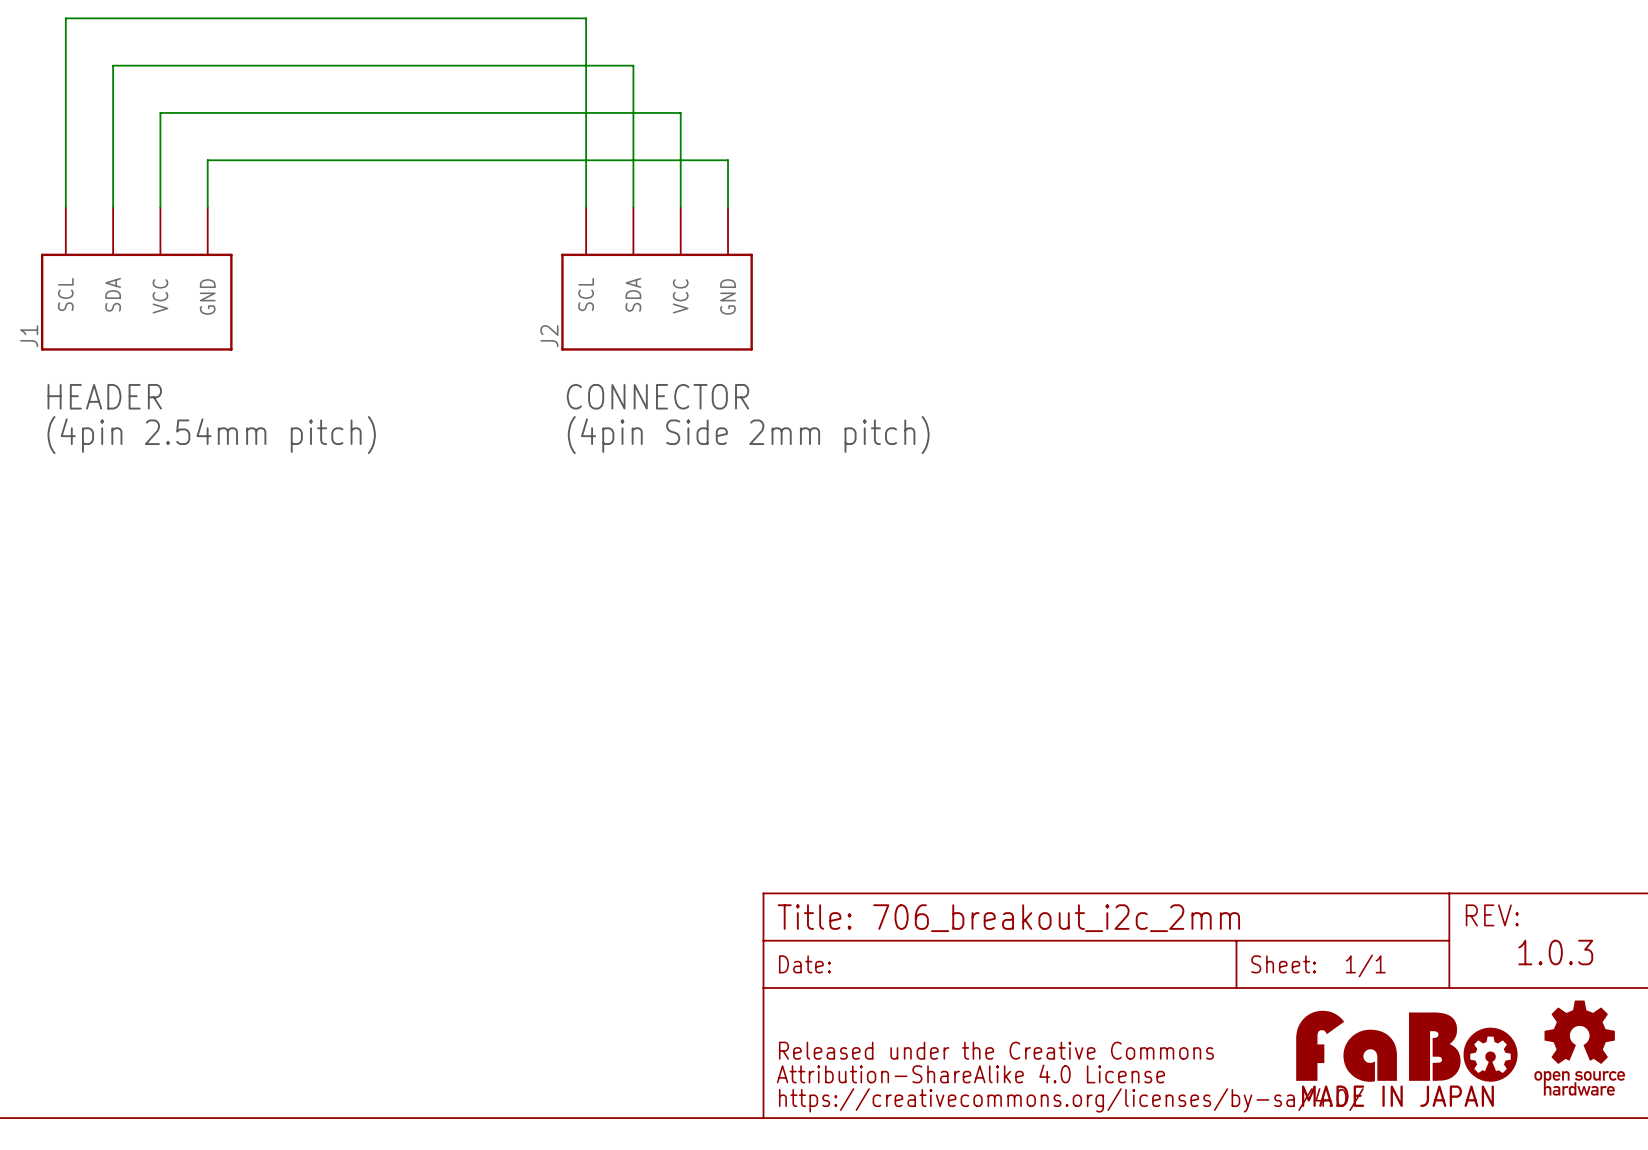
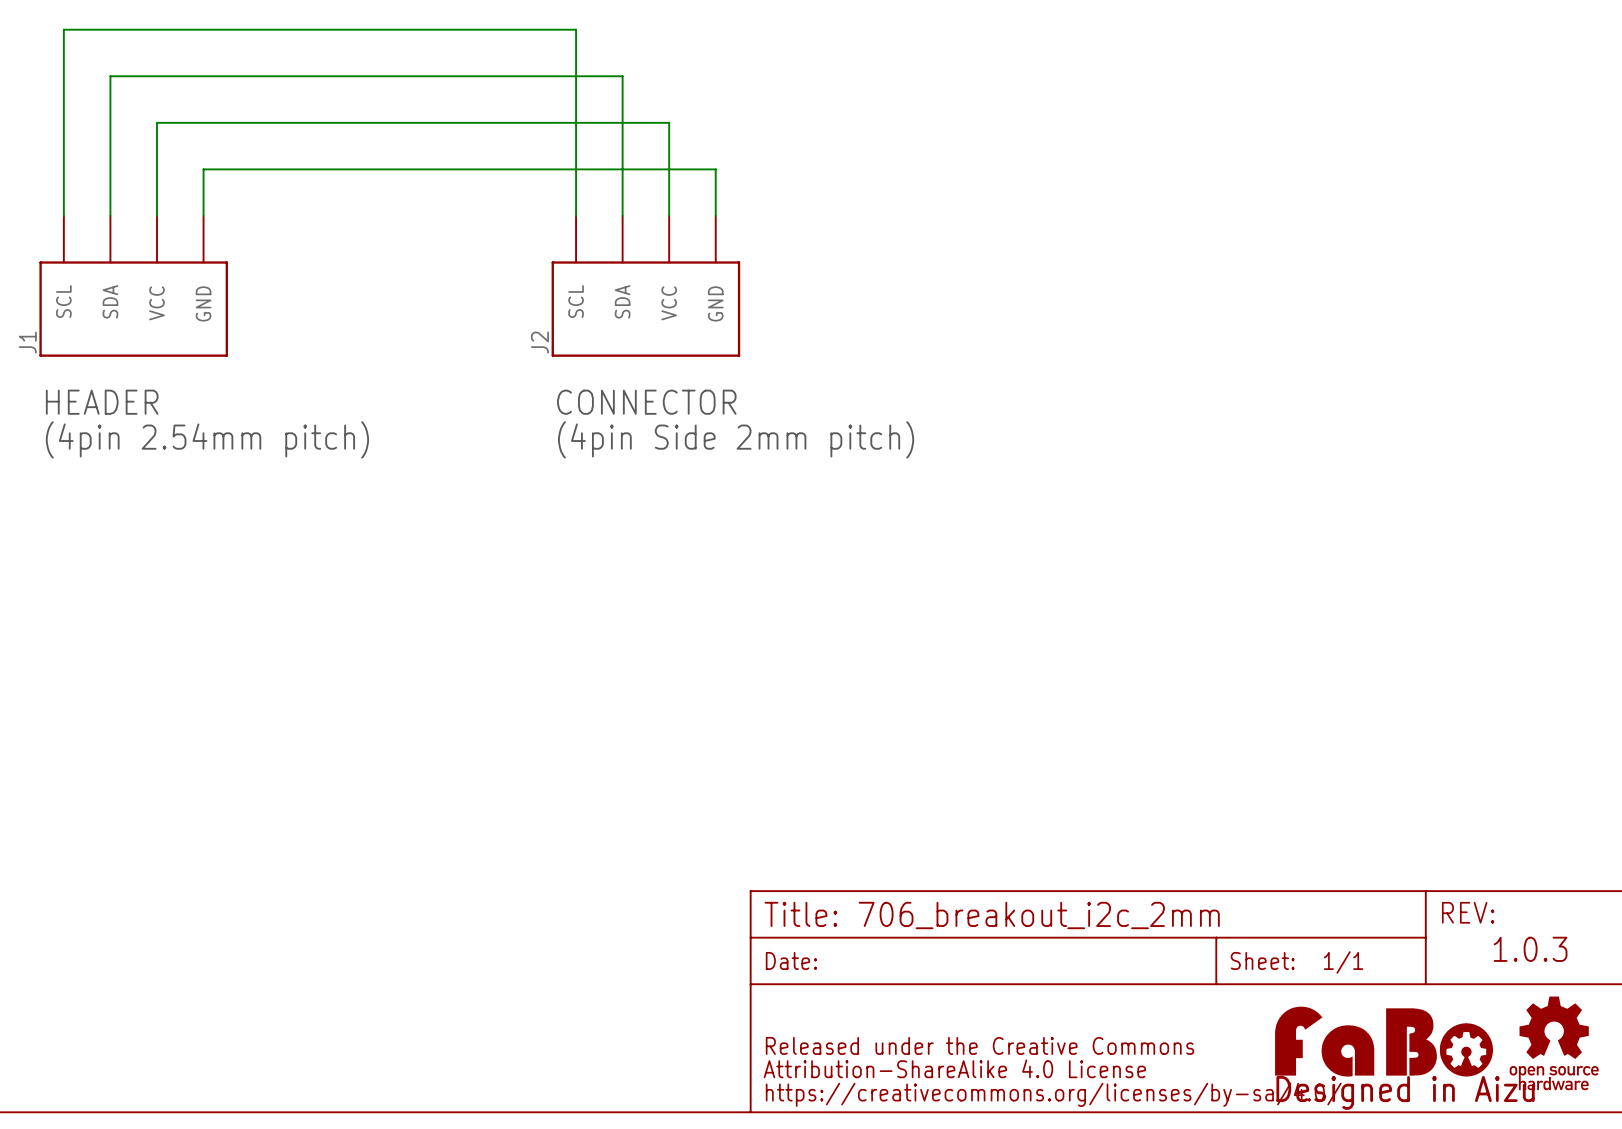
part text: MADE IN JAPAN (1397, 1096) -> none
part text: none -> Designed in Aizu (1405, 1092)

